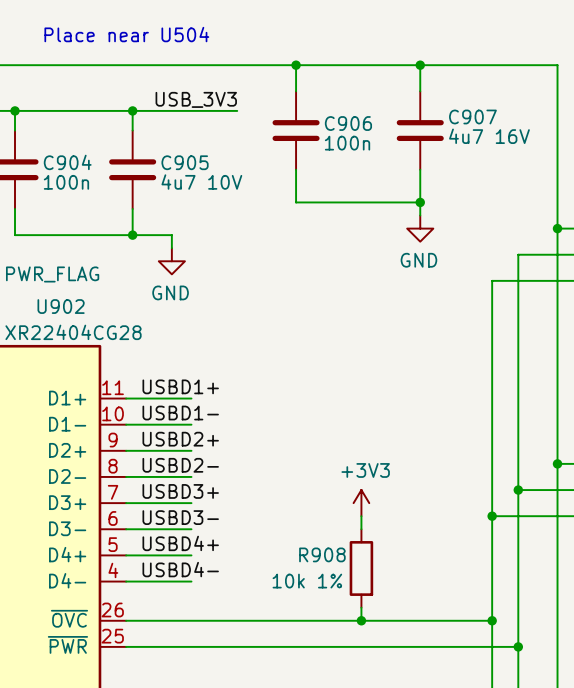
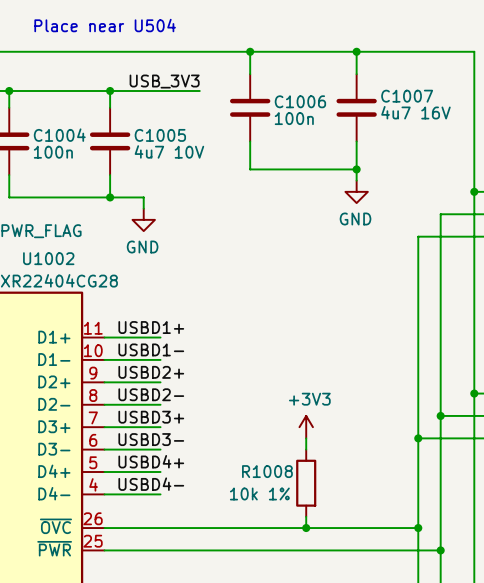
C907 name: C907 (472, 116) -> C1007 (407, 96)
C906 name: C906 (348, 123) -> C1006 (300, 101)
C904 name: C904 (67, 162) -> C1004 (59, 135)
C905 name: C905 (185, 162) -> C1005 (160, 135)
U902 name: U902 (61, 306) -> U1002 (48, 258)
R908 name: R908 (322, 554) -> R1008 (267, 471)

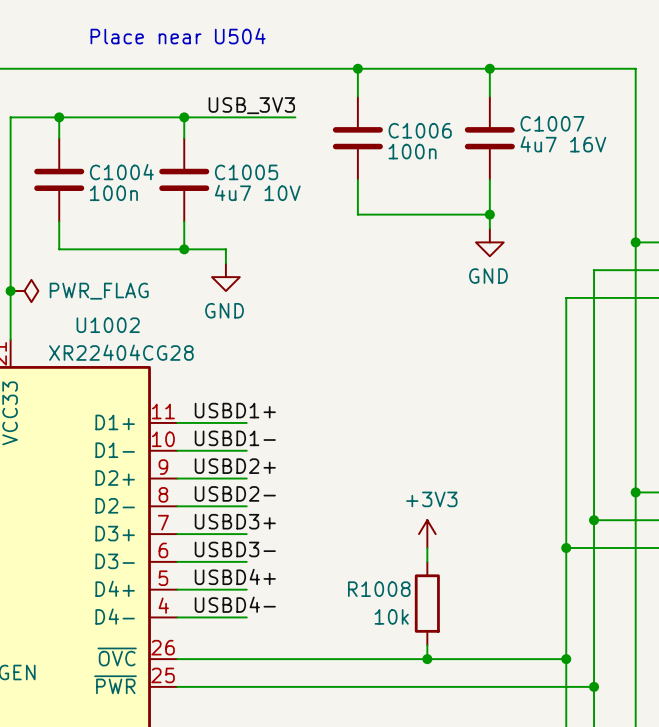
R1008 value: 10k 1% (259, 493) -> 10k (391, 616)

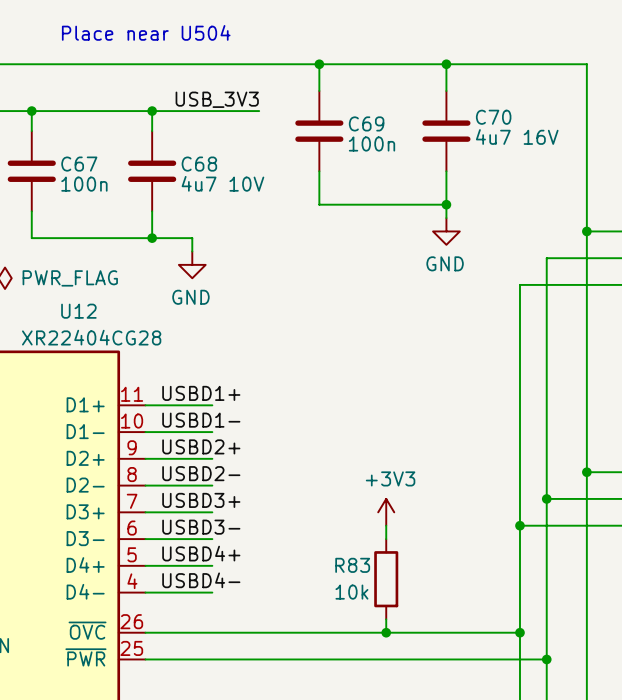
C1007 name: C1007 (552, 123) -> C70 (493, 117)
C1006 name: C1006 (420, 130) -> C69 (366, 123)
C1004 name: C1004 (121, 172) -> C67 (79, 164)
C1005 name: C1005 (246, 172) -> C68 (199, 164)
U1002 name: U1002 (108, 325) -> U12 (78, 311)
R1008 name: R1008 (379, 589) -> R83 (352, 565)

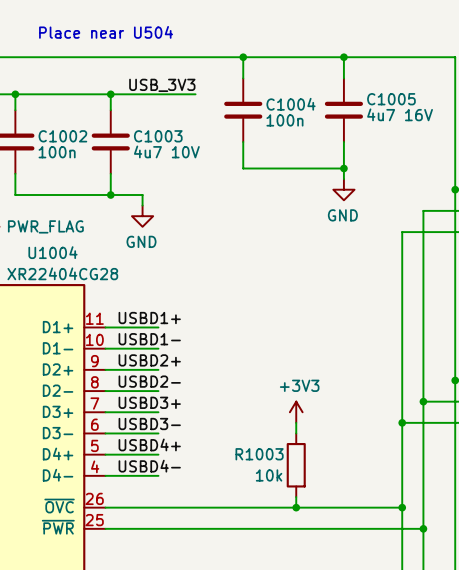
C70 name: C70 (493, 117) -> C1005 (391, 99)
C69 name: C69 (366, 123) -> C1004 (291, 104)
C67 name: C67 (79, 164) -> C1002 (62, 136)
C68 name: C68 (199, 164) -> C1003 (158, 136)
U12 name: U12 (78, 311) -> U1004 (52, 252)
R83 name: R83 (352, 565) -> R1003 (259, 454)

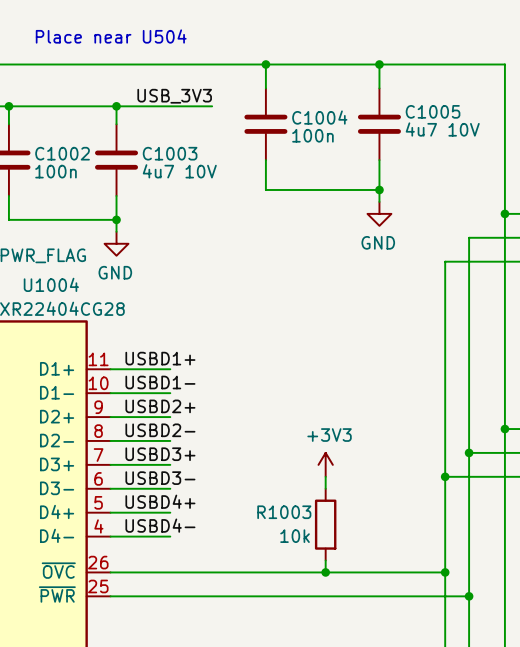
C1005 value: 4u7 16V (400, 114) -> 4u7 10V (442, 129)
wire: (110, 194) (142, 194) (142, 205) -> (116, 219) (116, 231)
power symbol position: GND (142, 216) -> GND (116, 243)

